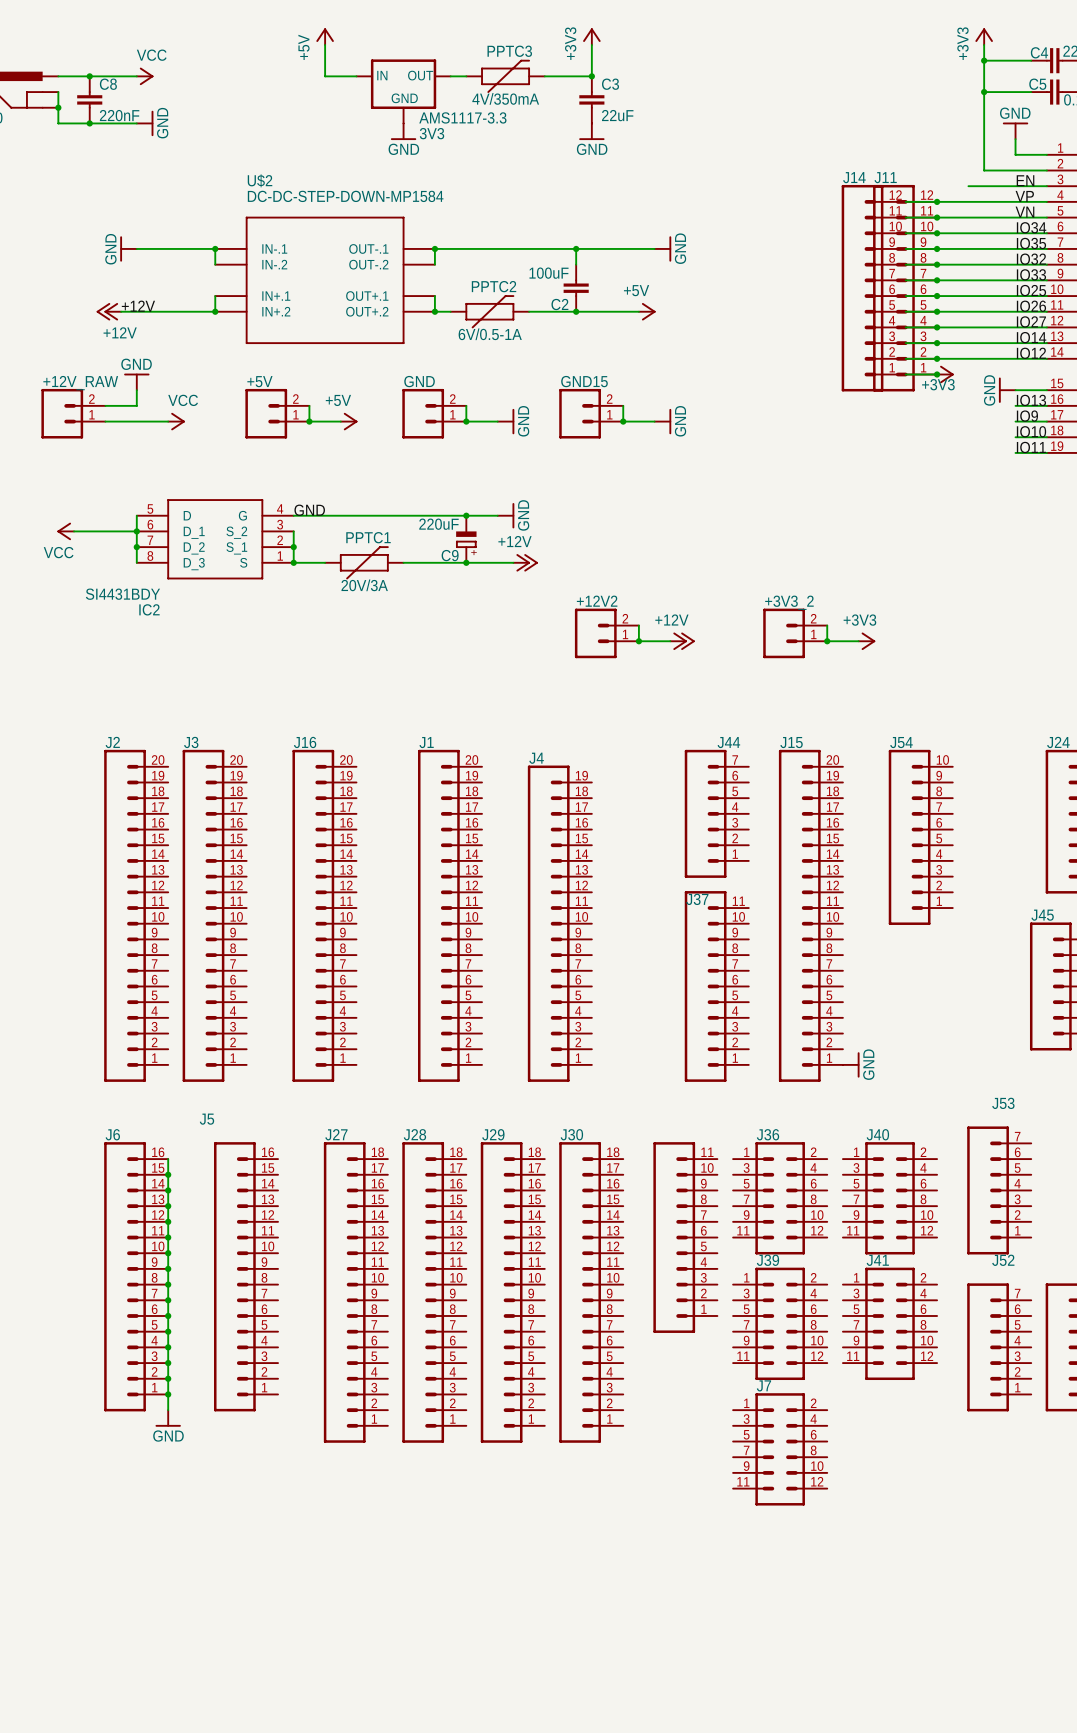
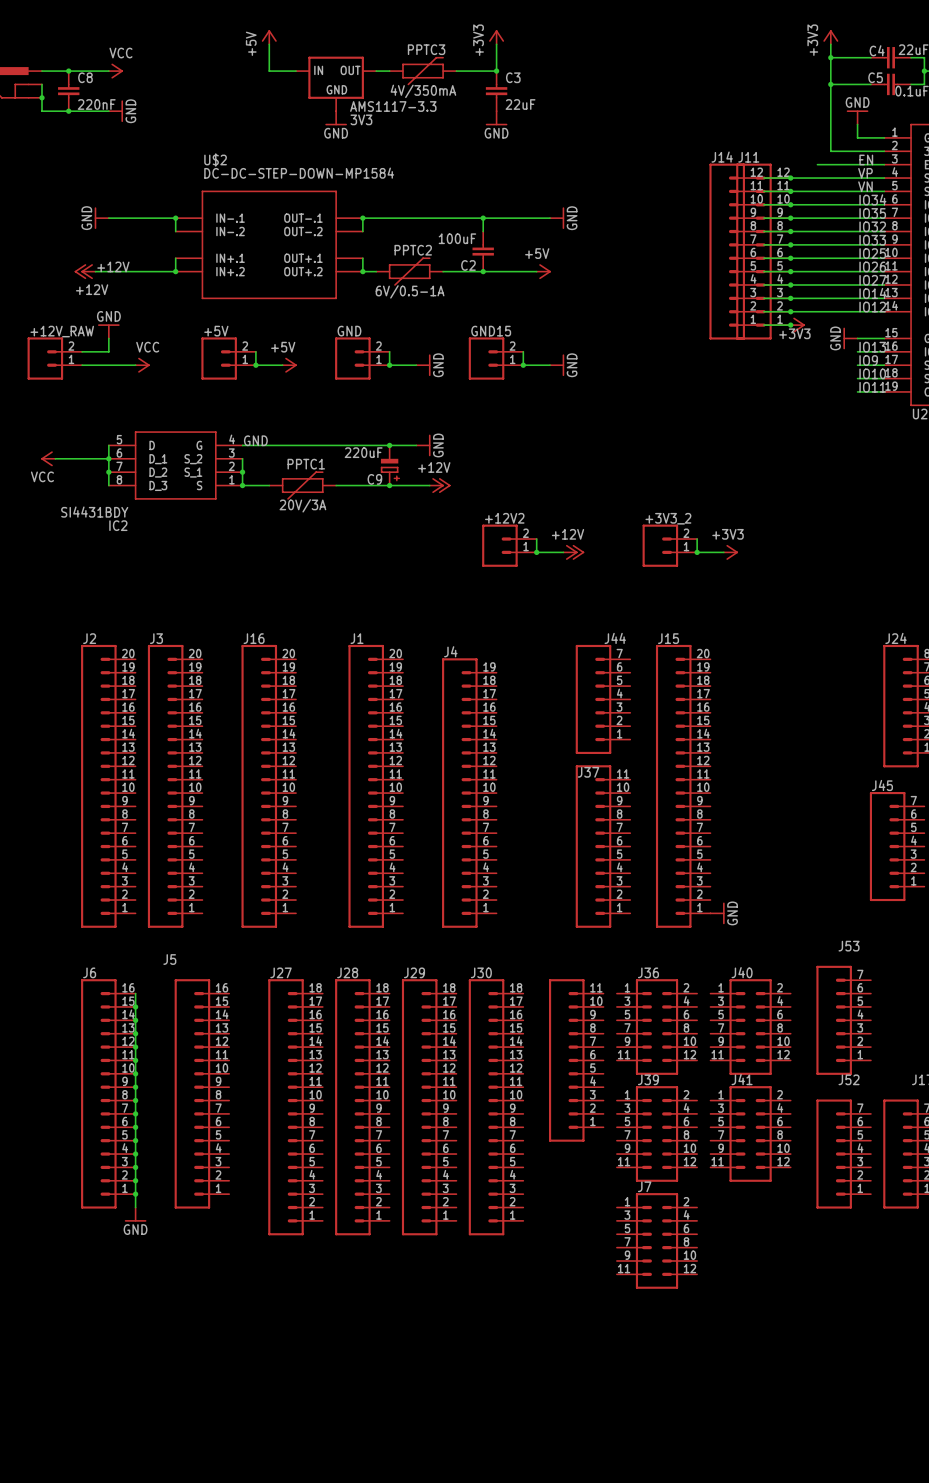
J54: (920, 837) -> none

